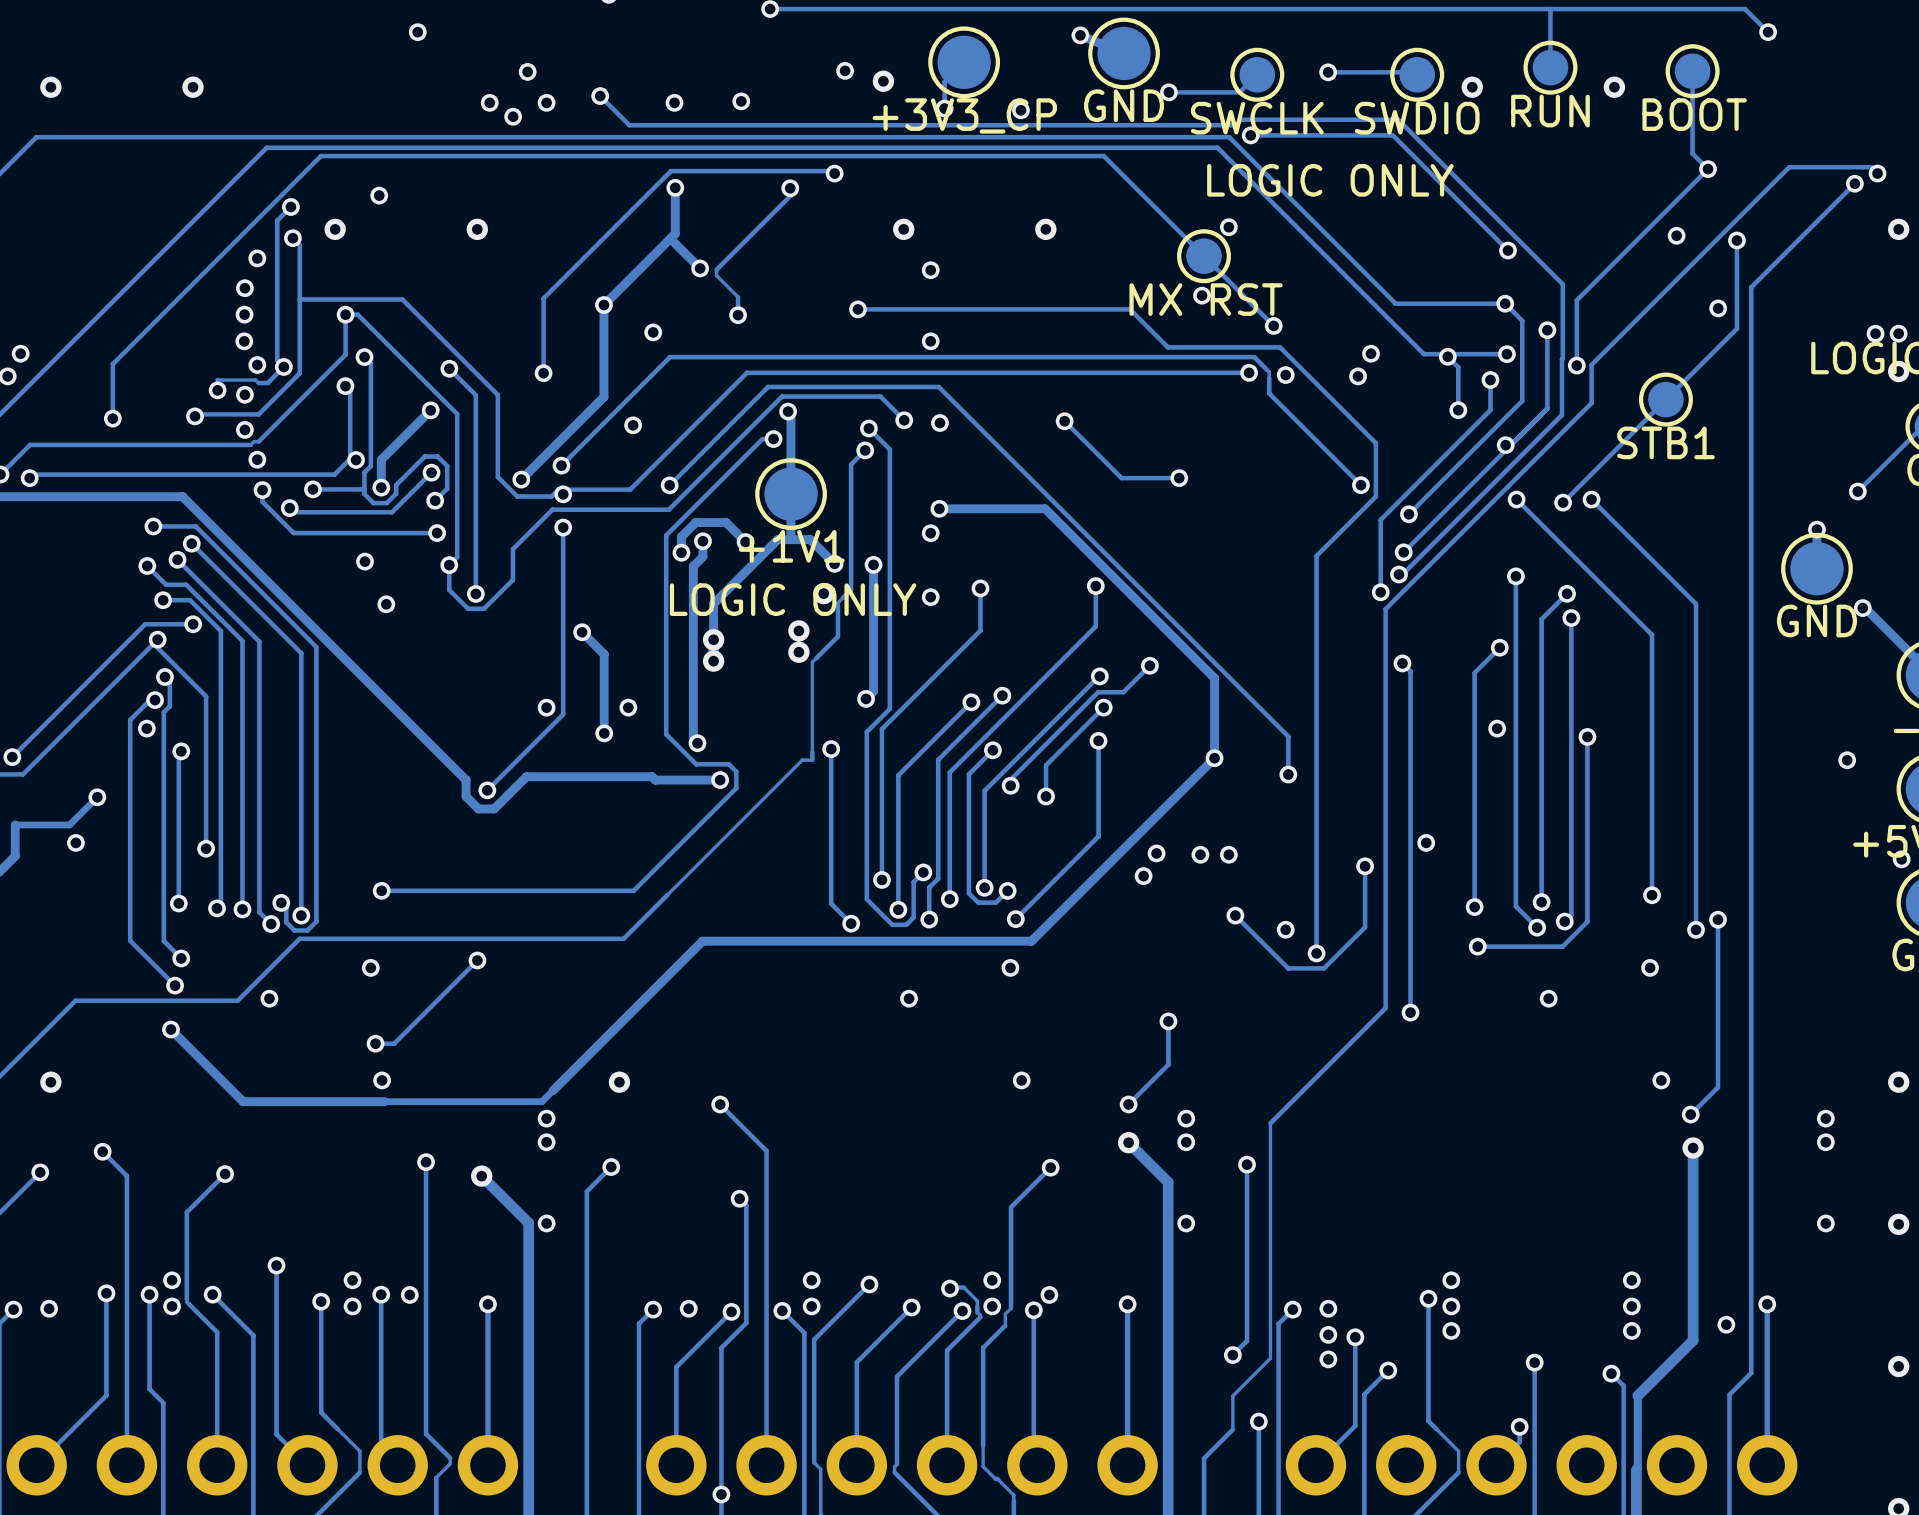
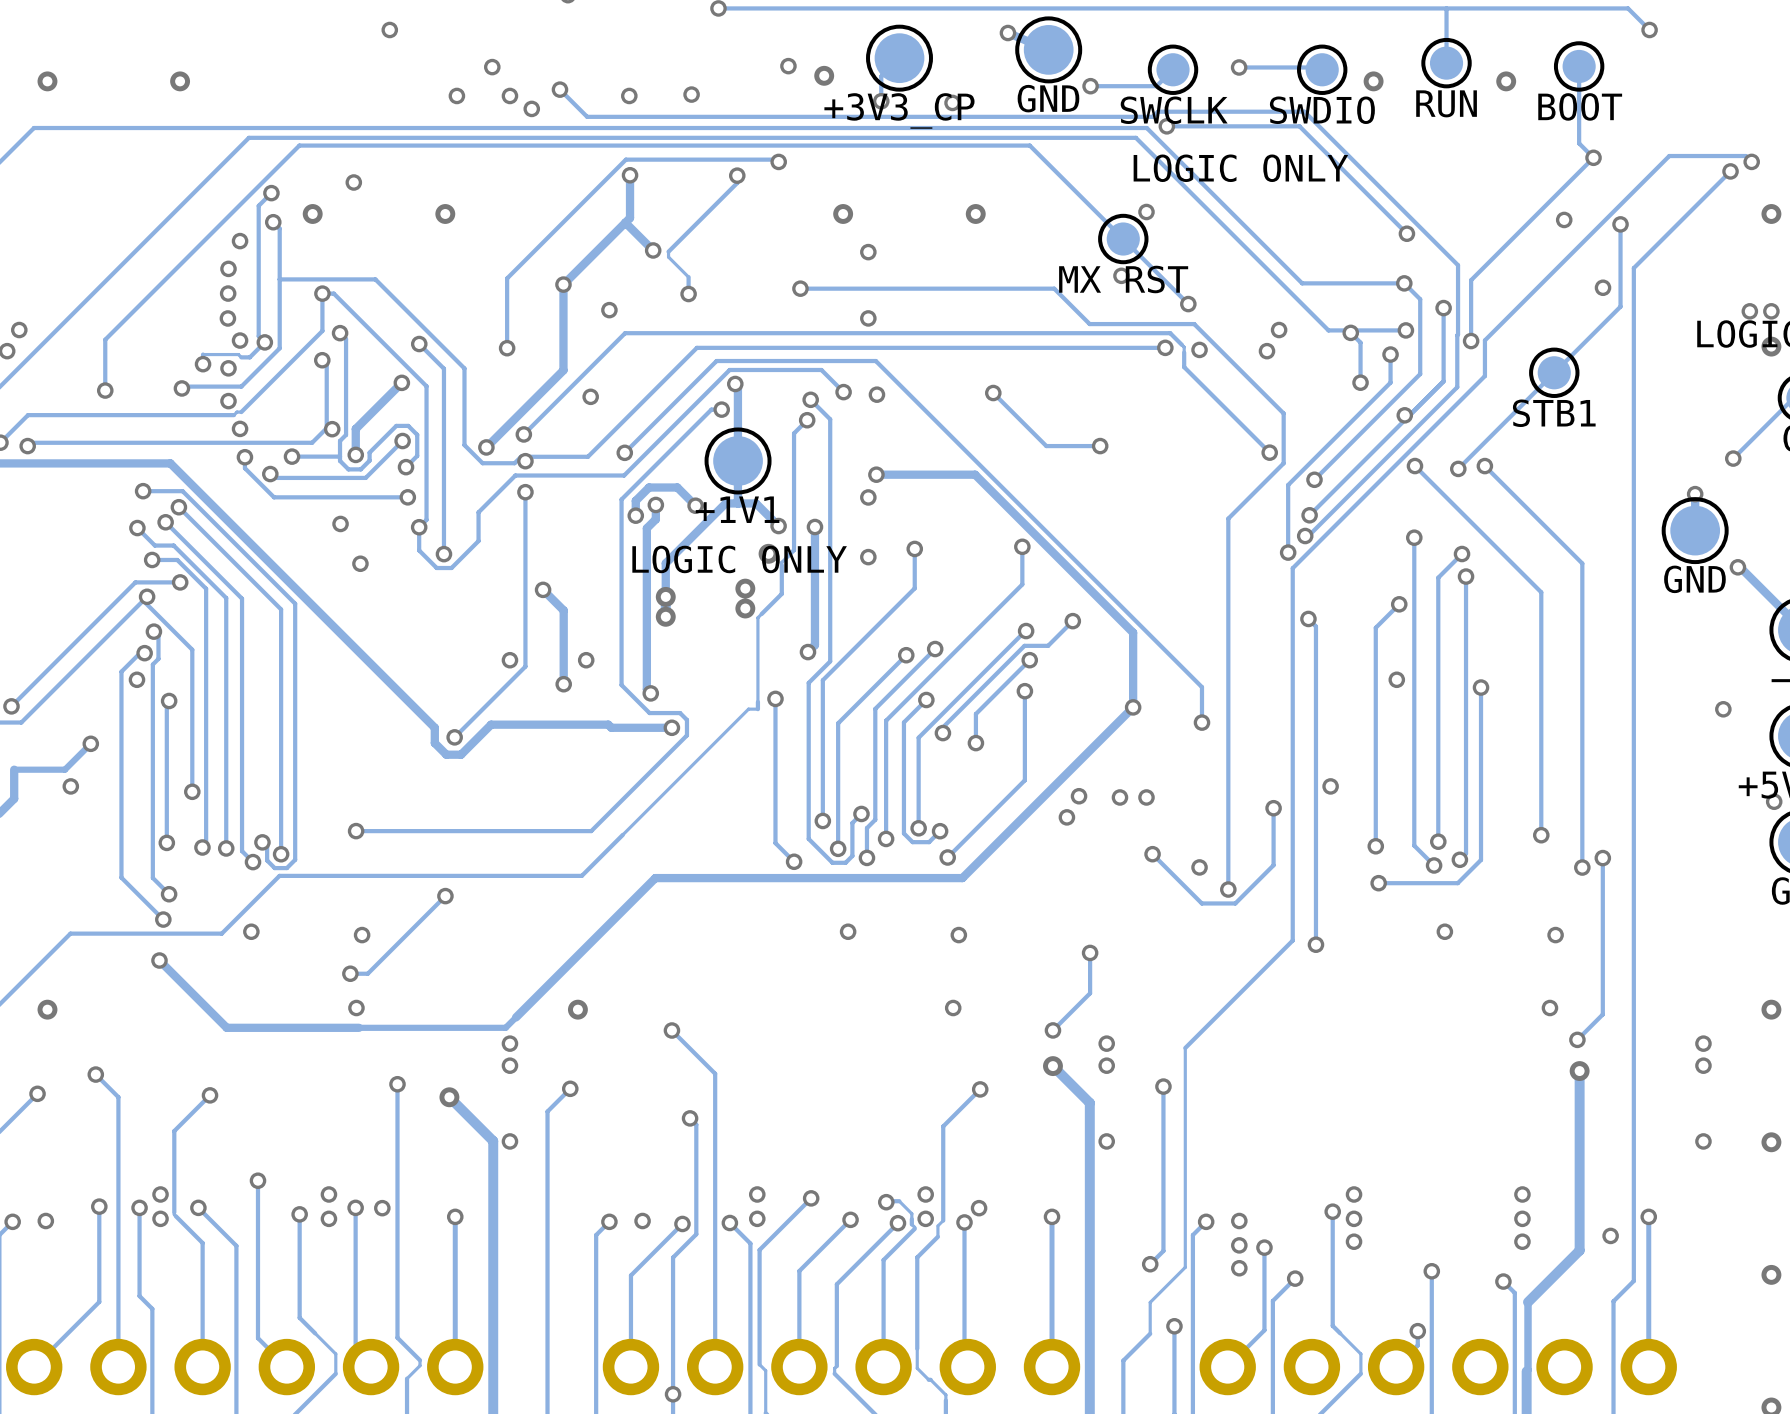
via position: (513, 116) -> (531, 108)
via position: (370, 967) -> (362, 935)
via position: (1010, 967) -> (958, 935)
via position: (1650, 967) -> (1555, 935)

